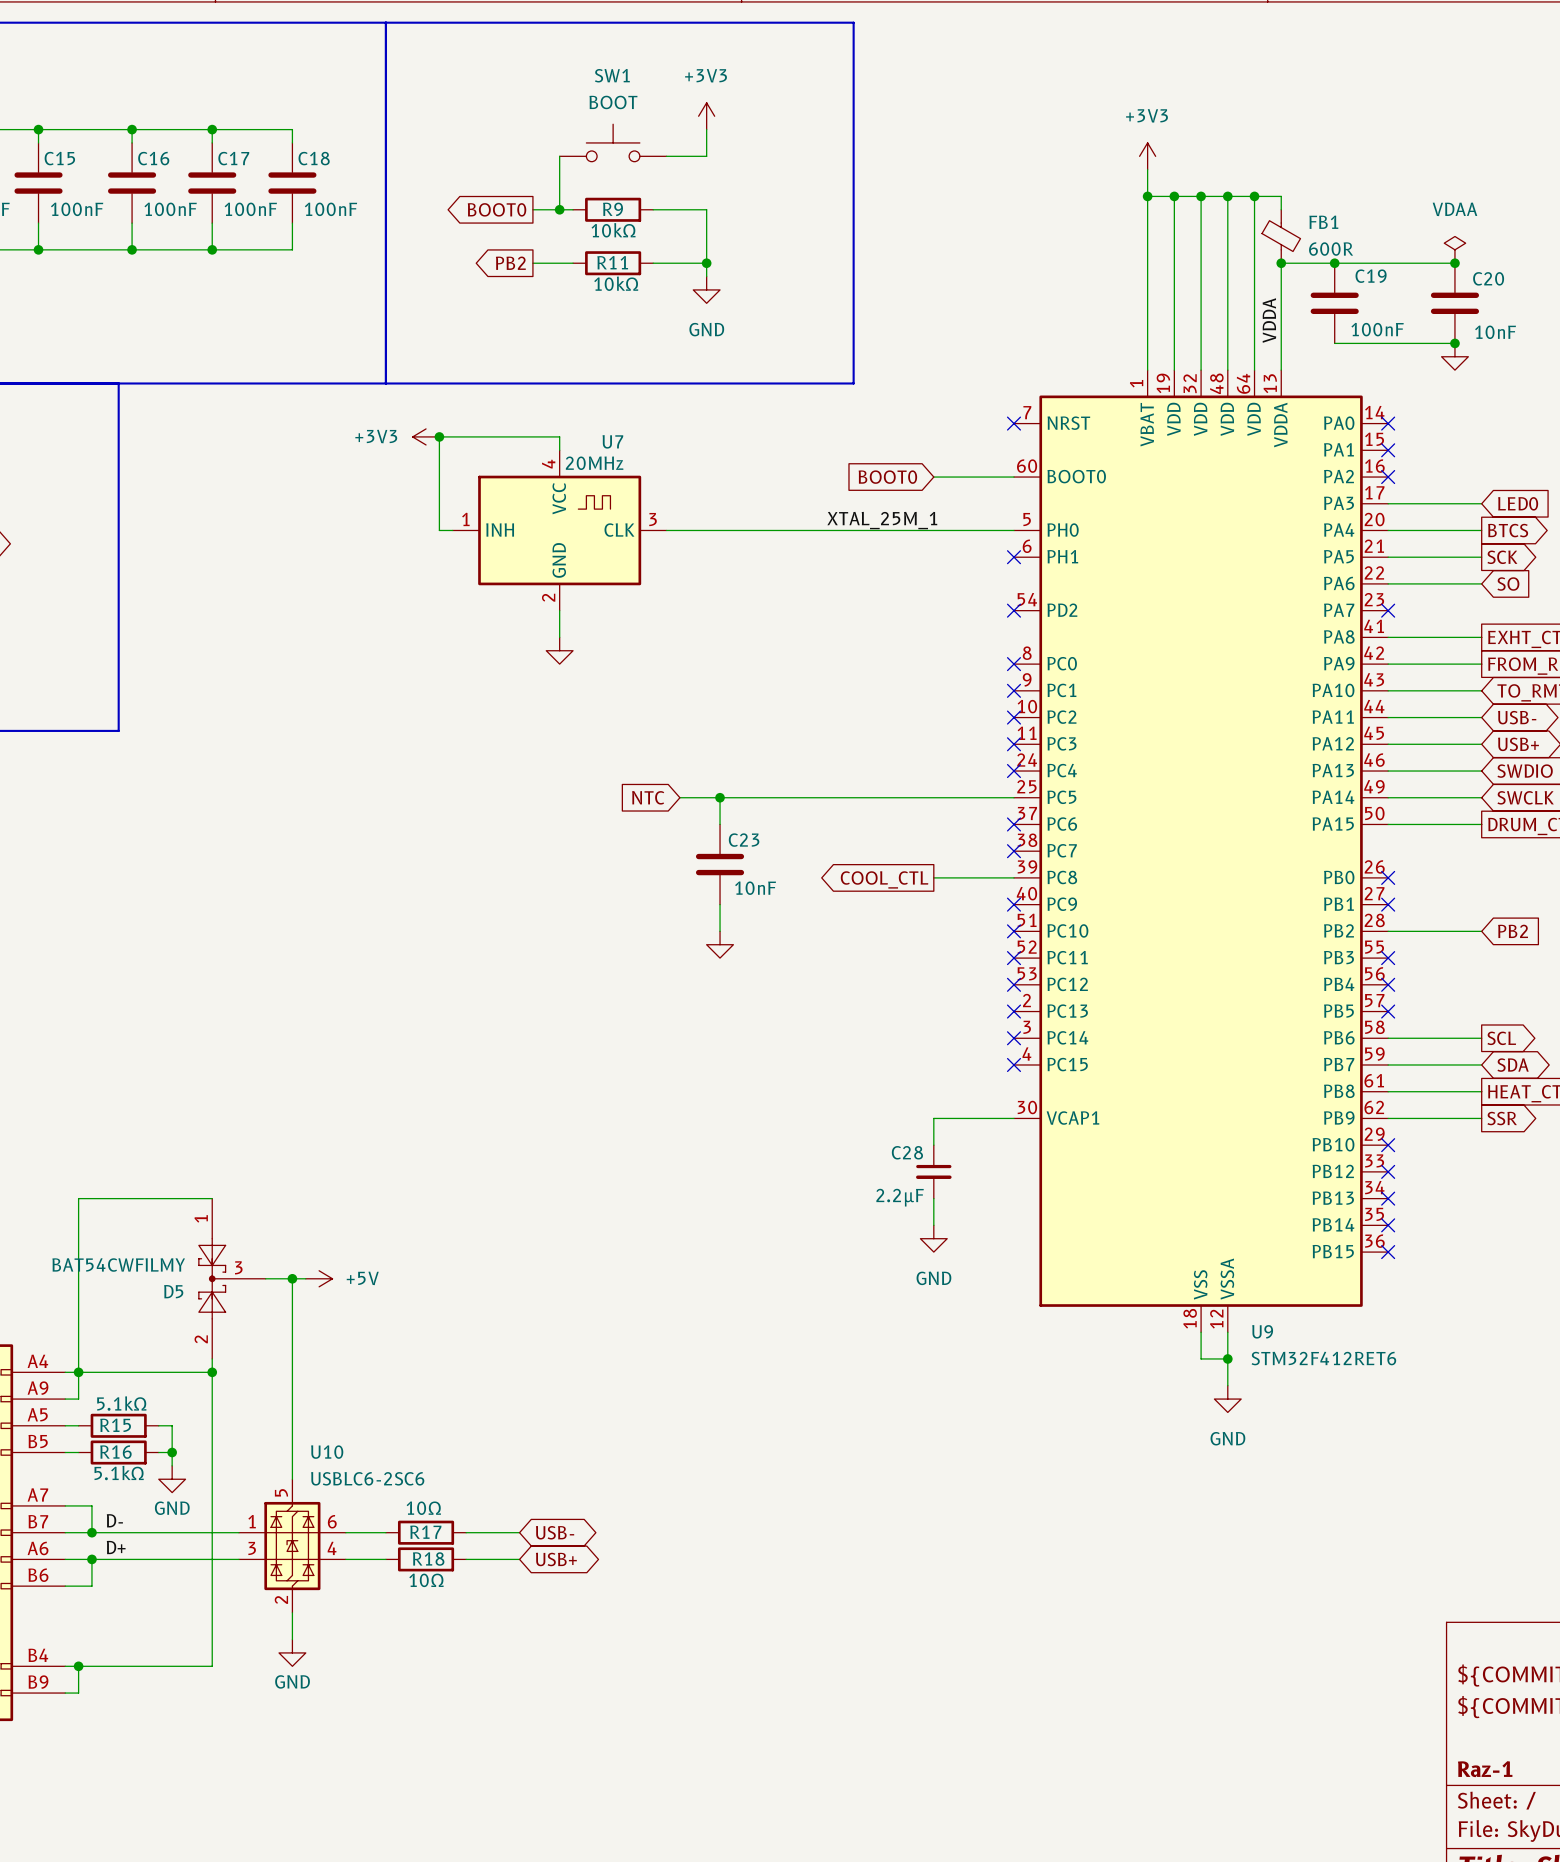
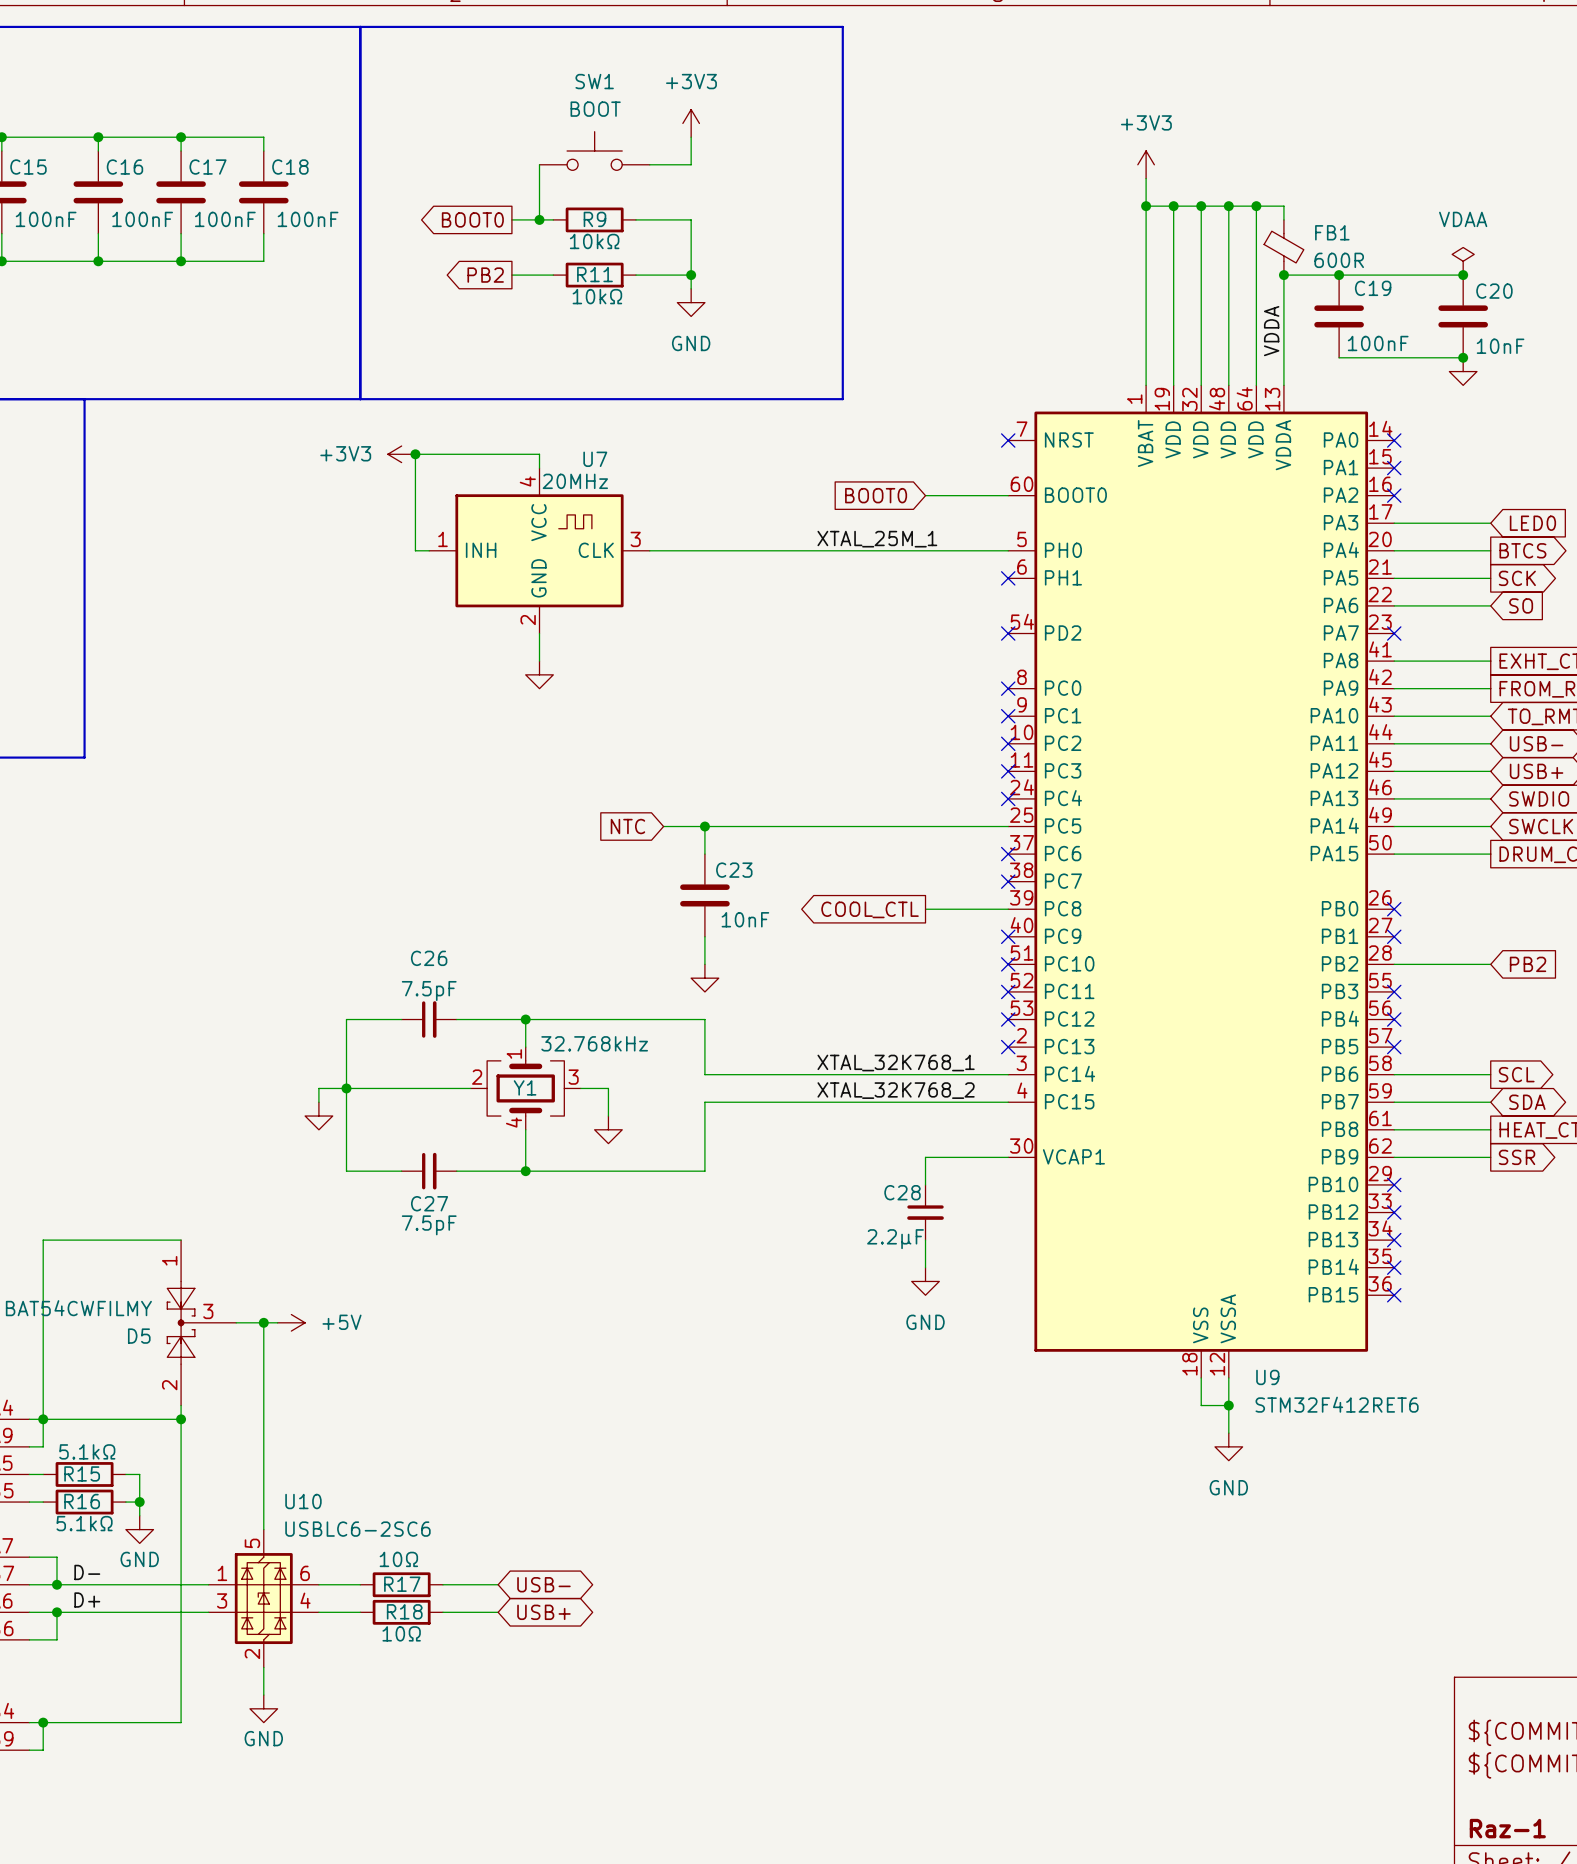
wire: none -> (401, 1019) (346, 1019) (346, 1171) (401, 1171)
C26: none -> 7.5pF (429, 1019)
wire: none -> (456, 1019) (704, 1019) (704, 1074) (1008, 1074)
wire: none -> (525, 1019) (525, 1047)
junction: none -> (525, 1019)
label: none -> XTAL_32K768_1 (896, 1063)
no-connect mark: (1013, 1038) -> none
junction: none -> (346, 1088)
wire: none -> (470, 1088) (318, 1088) (318, 1102)
Y1: none -> 32.768kHz (525, 1088)
wire: none -> (580, 1088) (608, 1088) (608, 1116)
label: none -> XTAL_32K768_2 (896, 1090)
wire: none -> (1008, 1102) (704, 1102) (704, 1171) (456, 1171)
no-connect mark: (1013, 1064) -> none
power symbol: none -> (318, 1116)
wire: none -> (525, 1129) (525, 1171)
power symbol: none -> (608, 1129)
C27: none -> 7.5pF (429, 1171)
junction: none -> (525, 1171)

